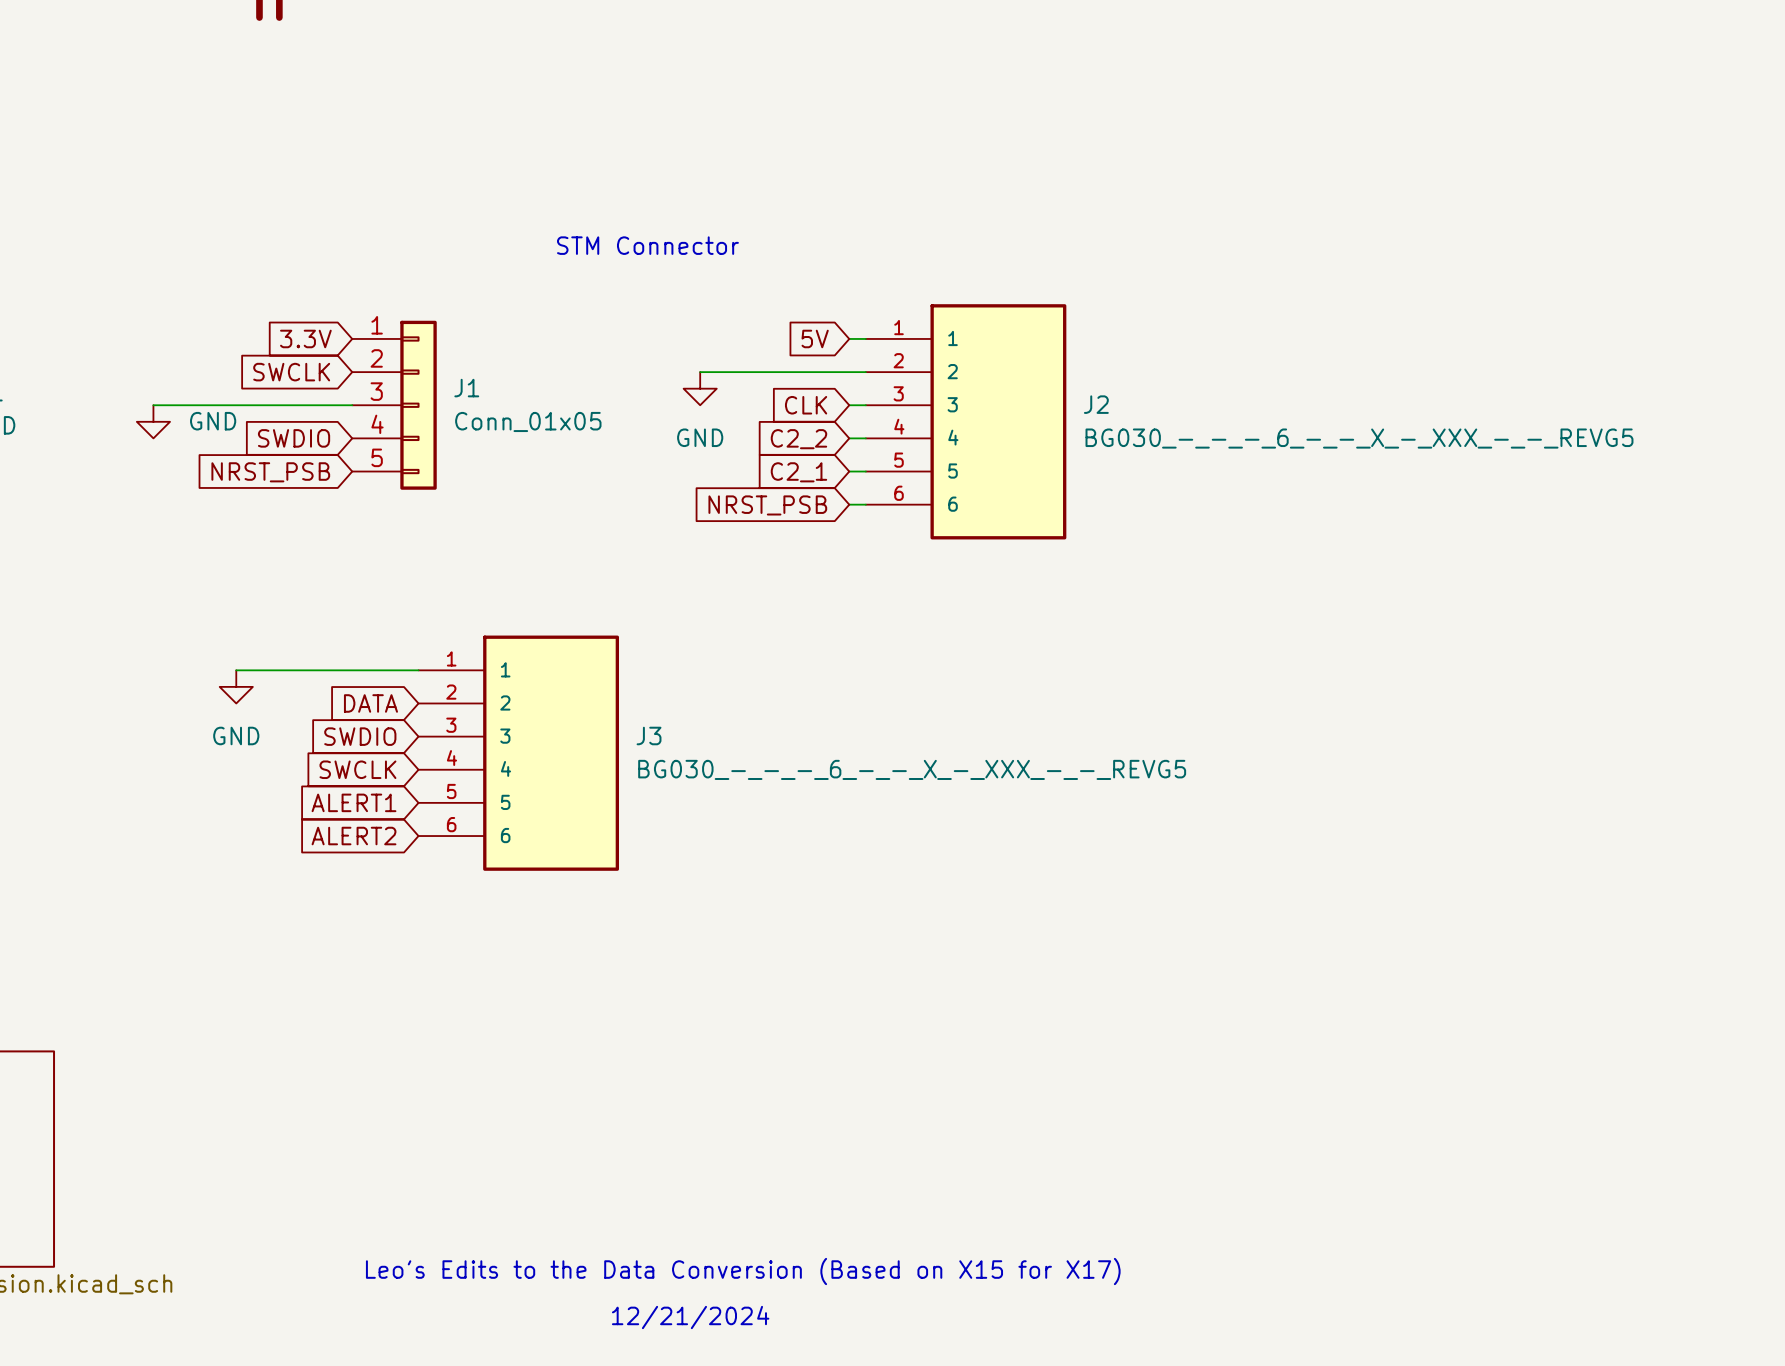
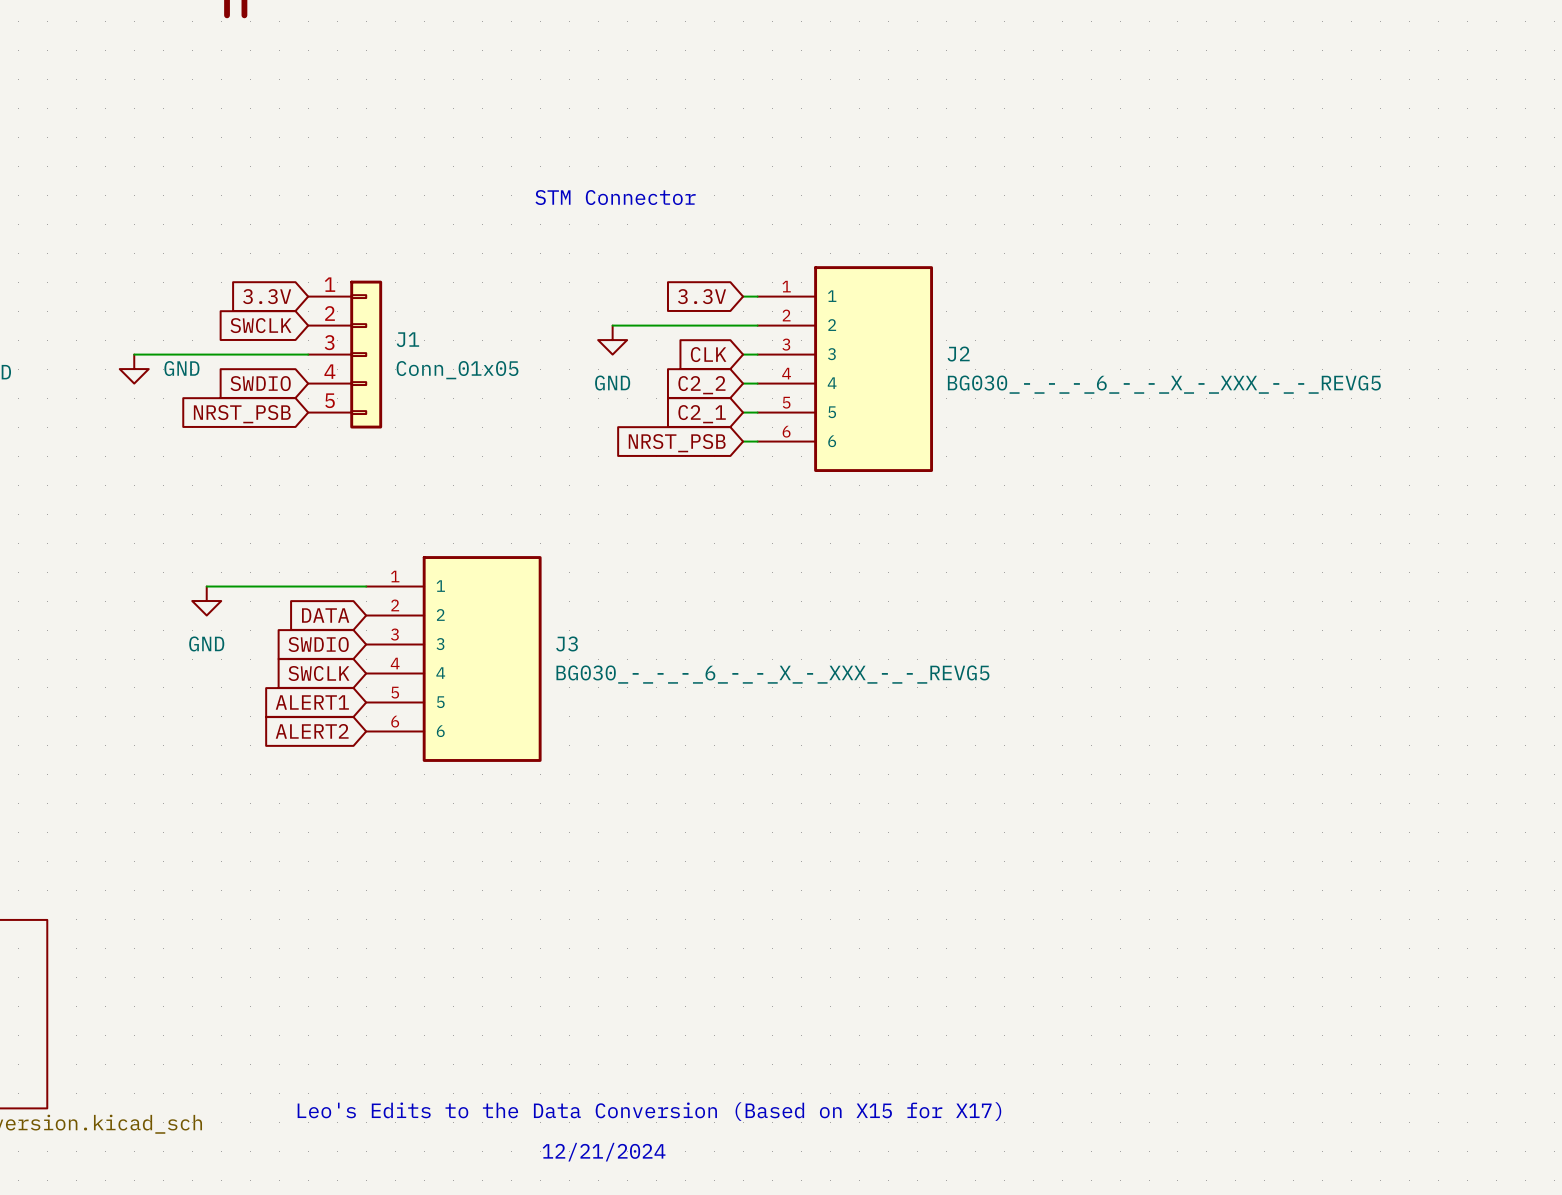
text position: STM Connector (647, 245) -> STM Connector (615, 197)
global label: 5V (815, 338) -> 3.3V (701, 296)

